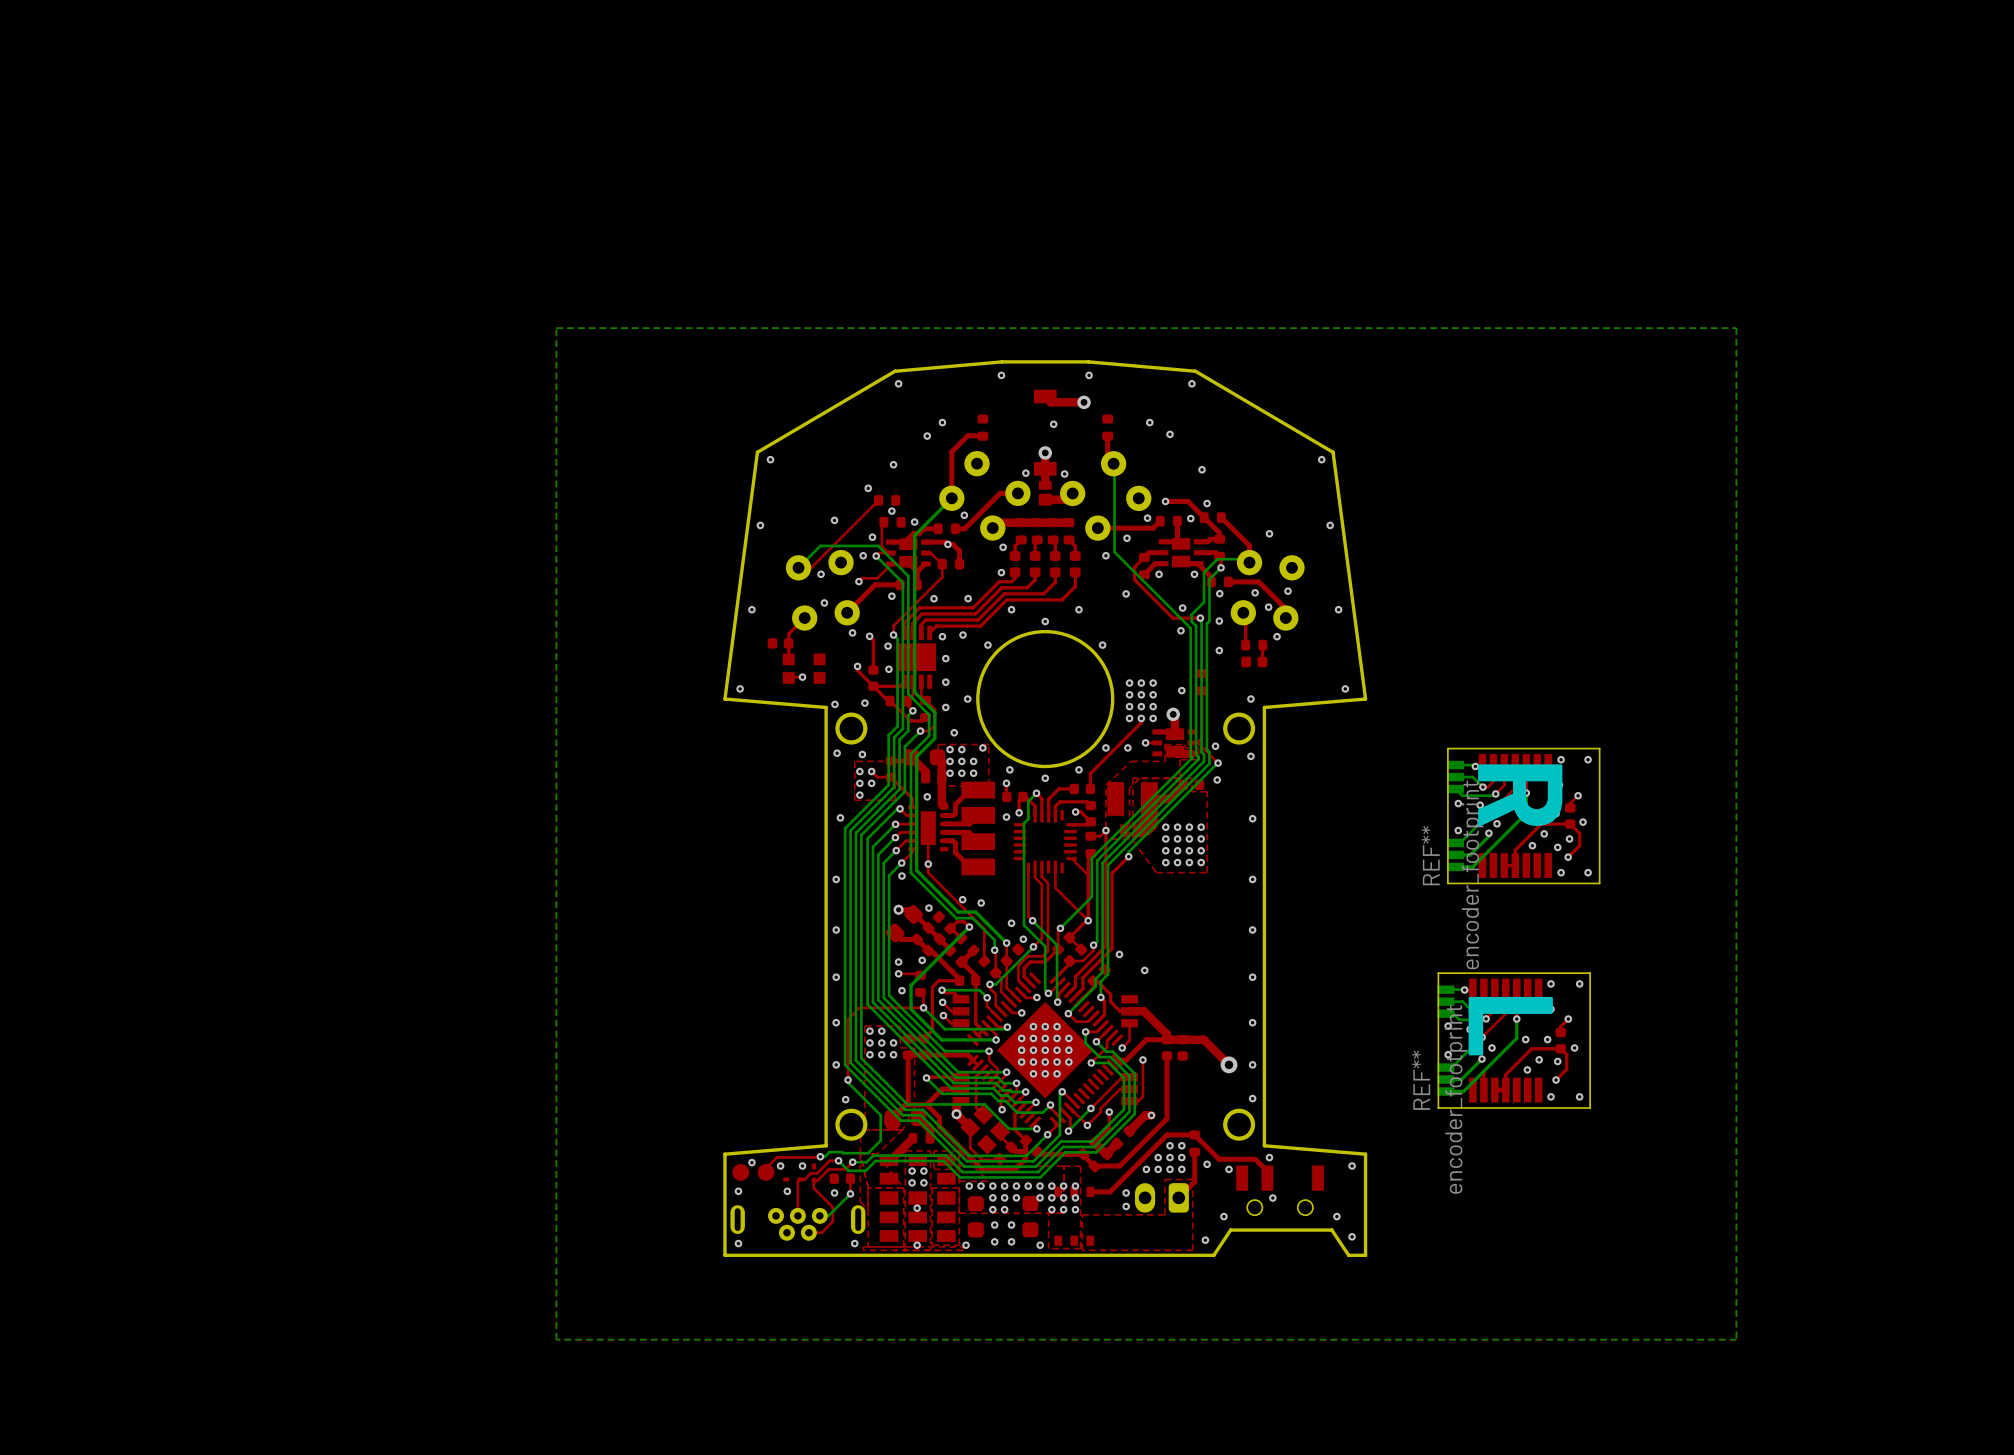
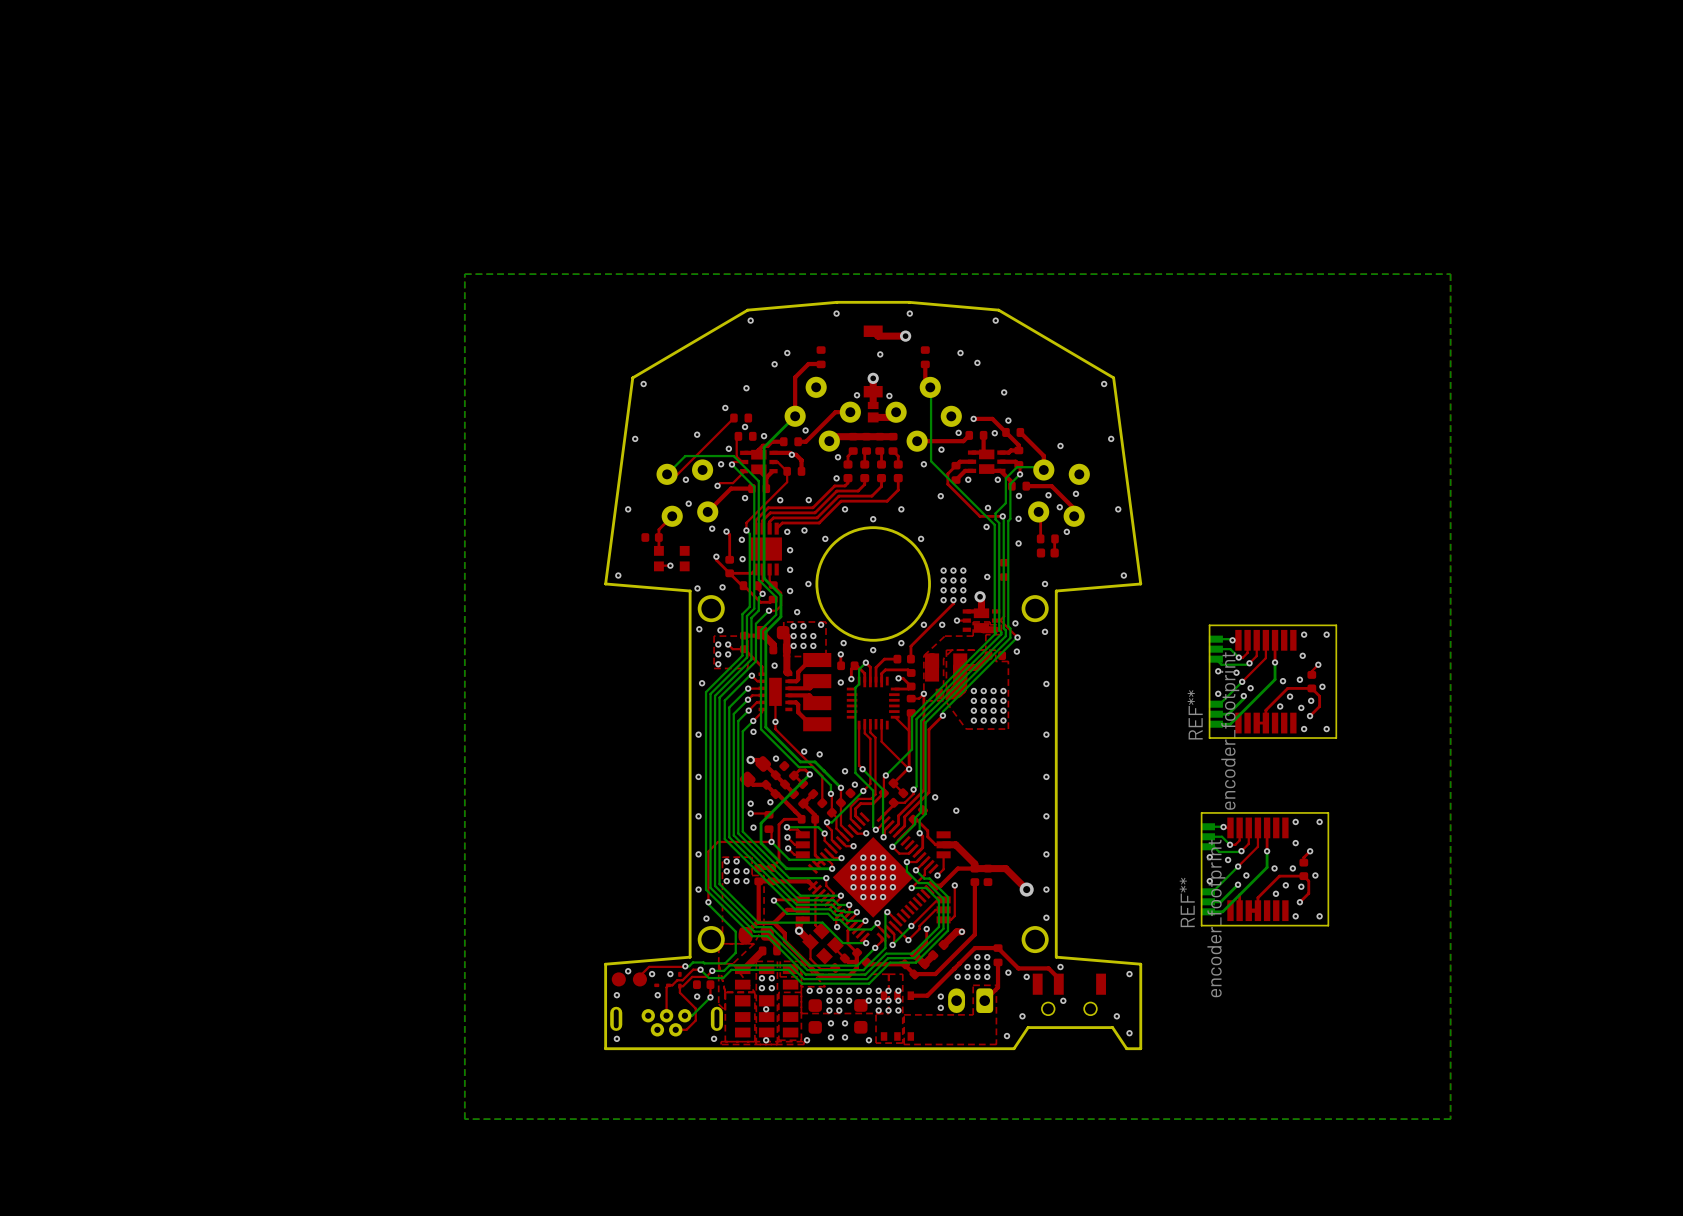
text: R (1520, 795) -> none
text: L (1510, 1026) -> none

